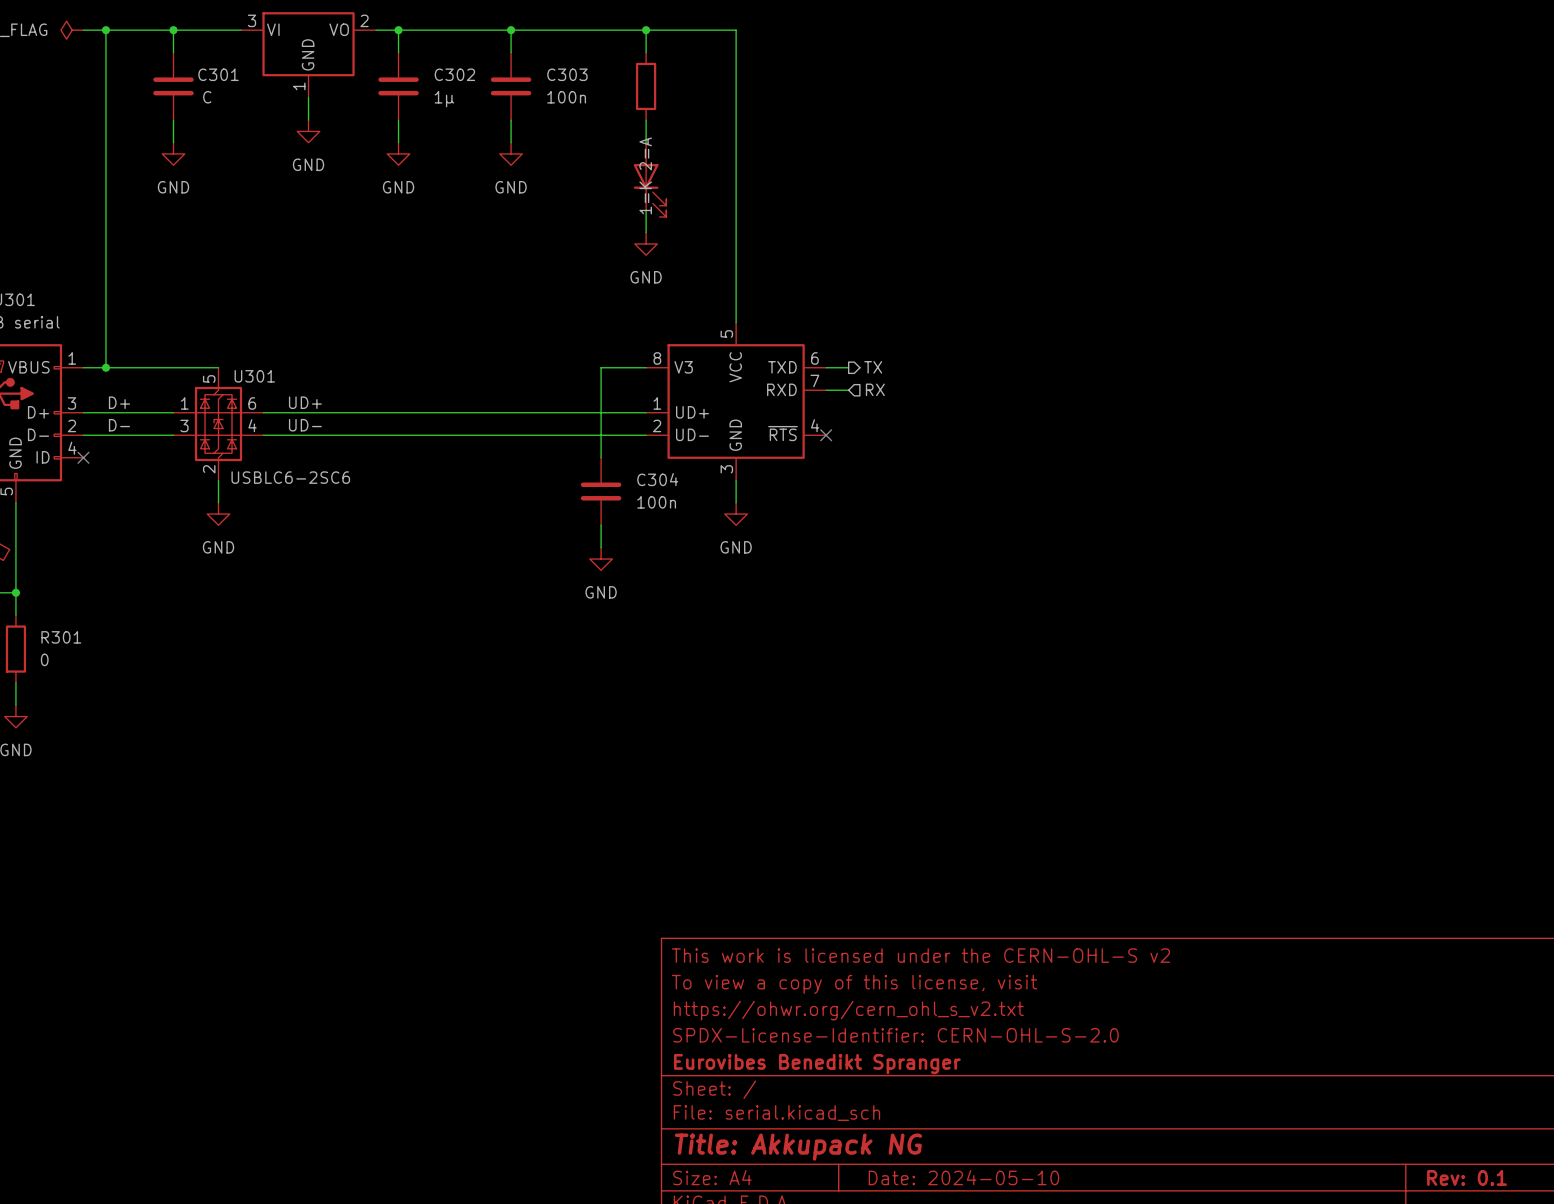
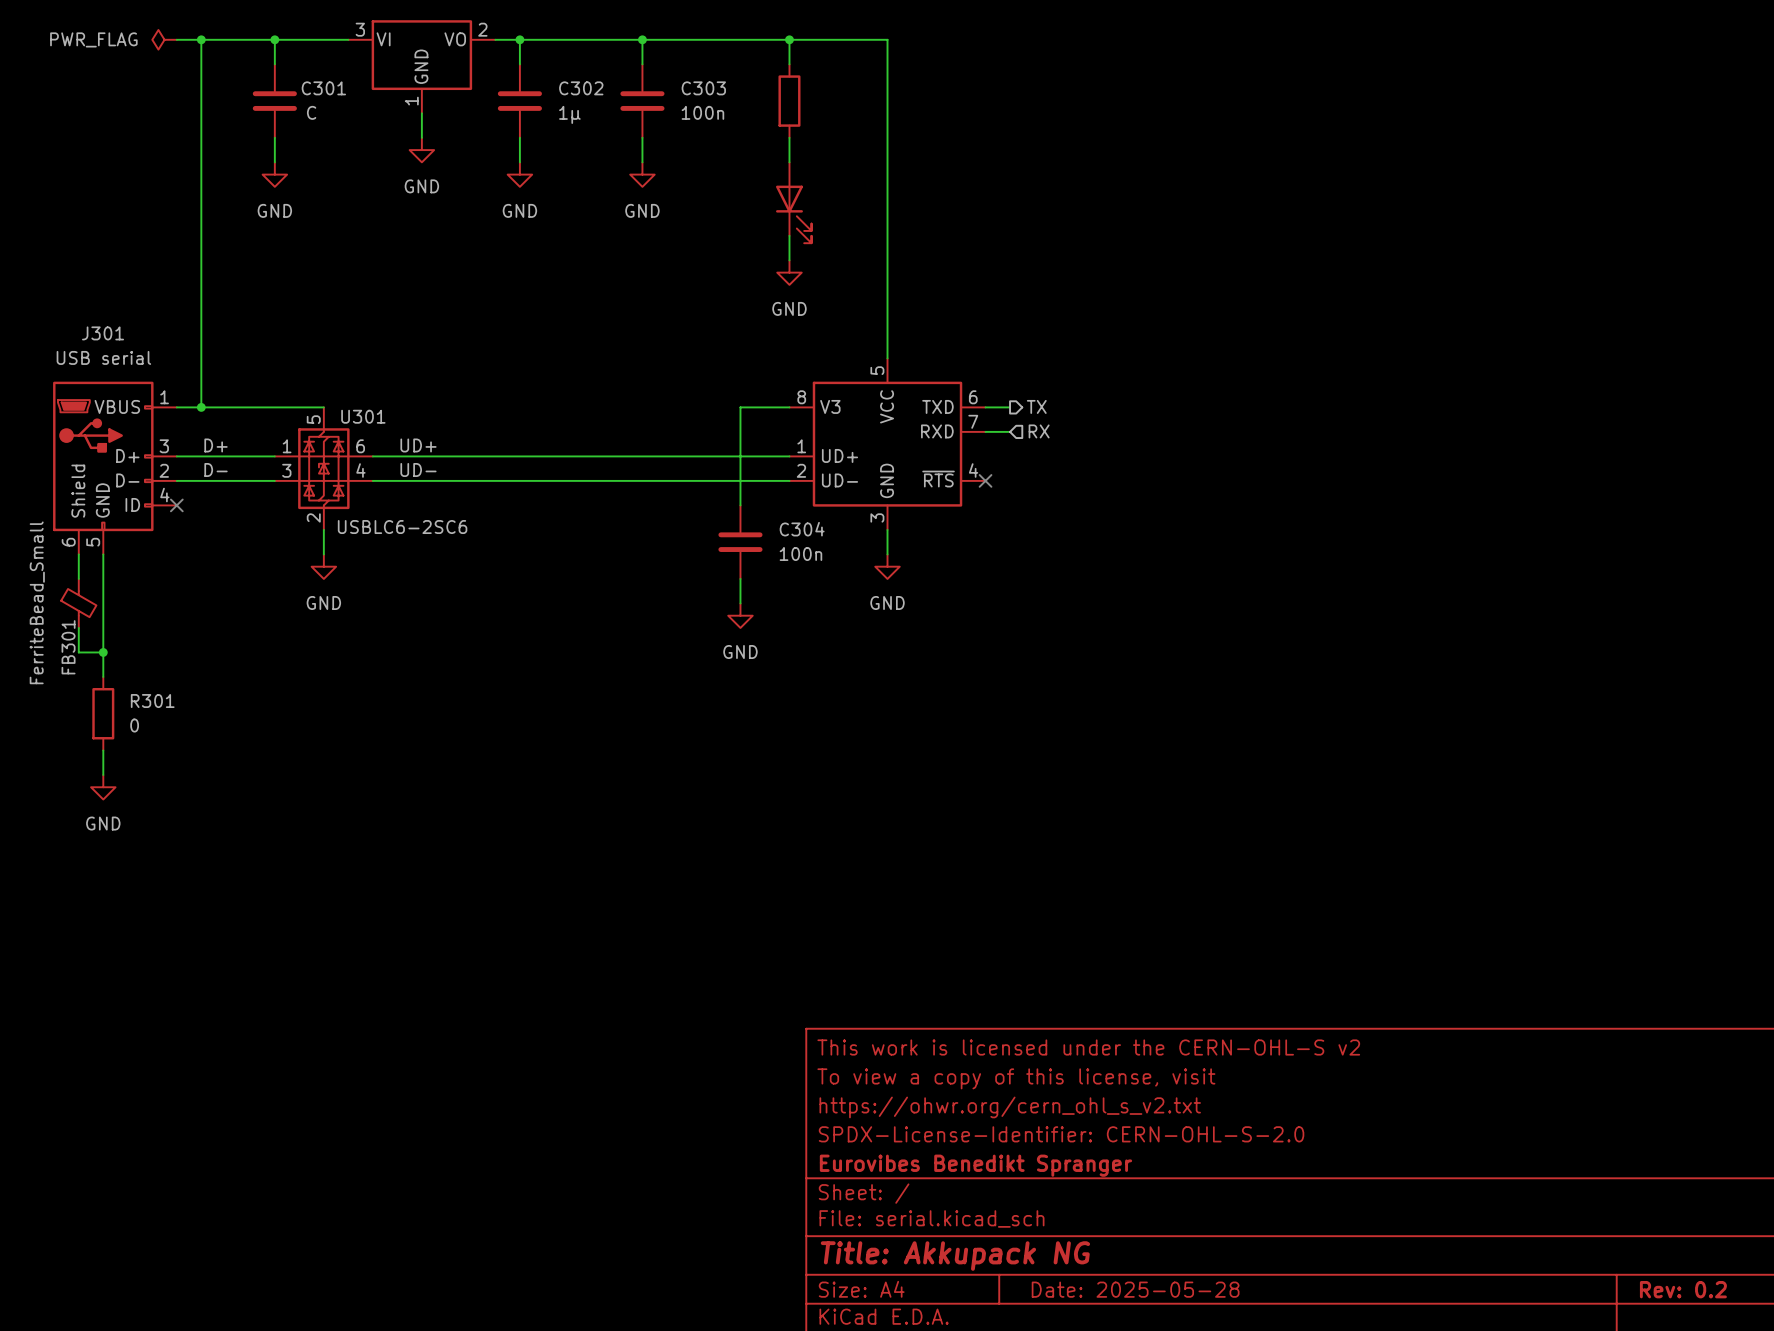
part text: 1=K 2=A (645, 175) -> none
title block: Date: 2024-05-10 (963, 1177) -> Date: 2025-05-28 (1135, 1289)
title block: Rev: 0.1 (1467, 1177) -> Rev: 0.2 (1683, 1289)

